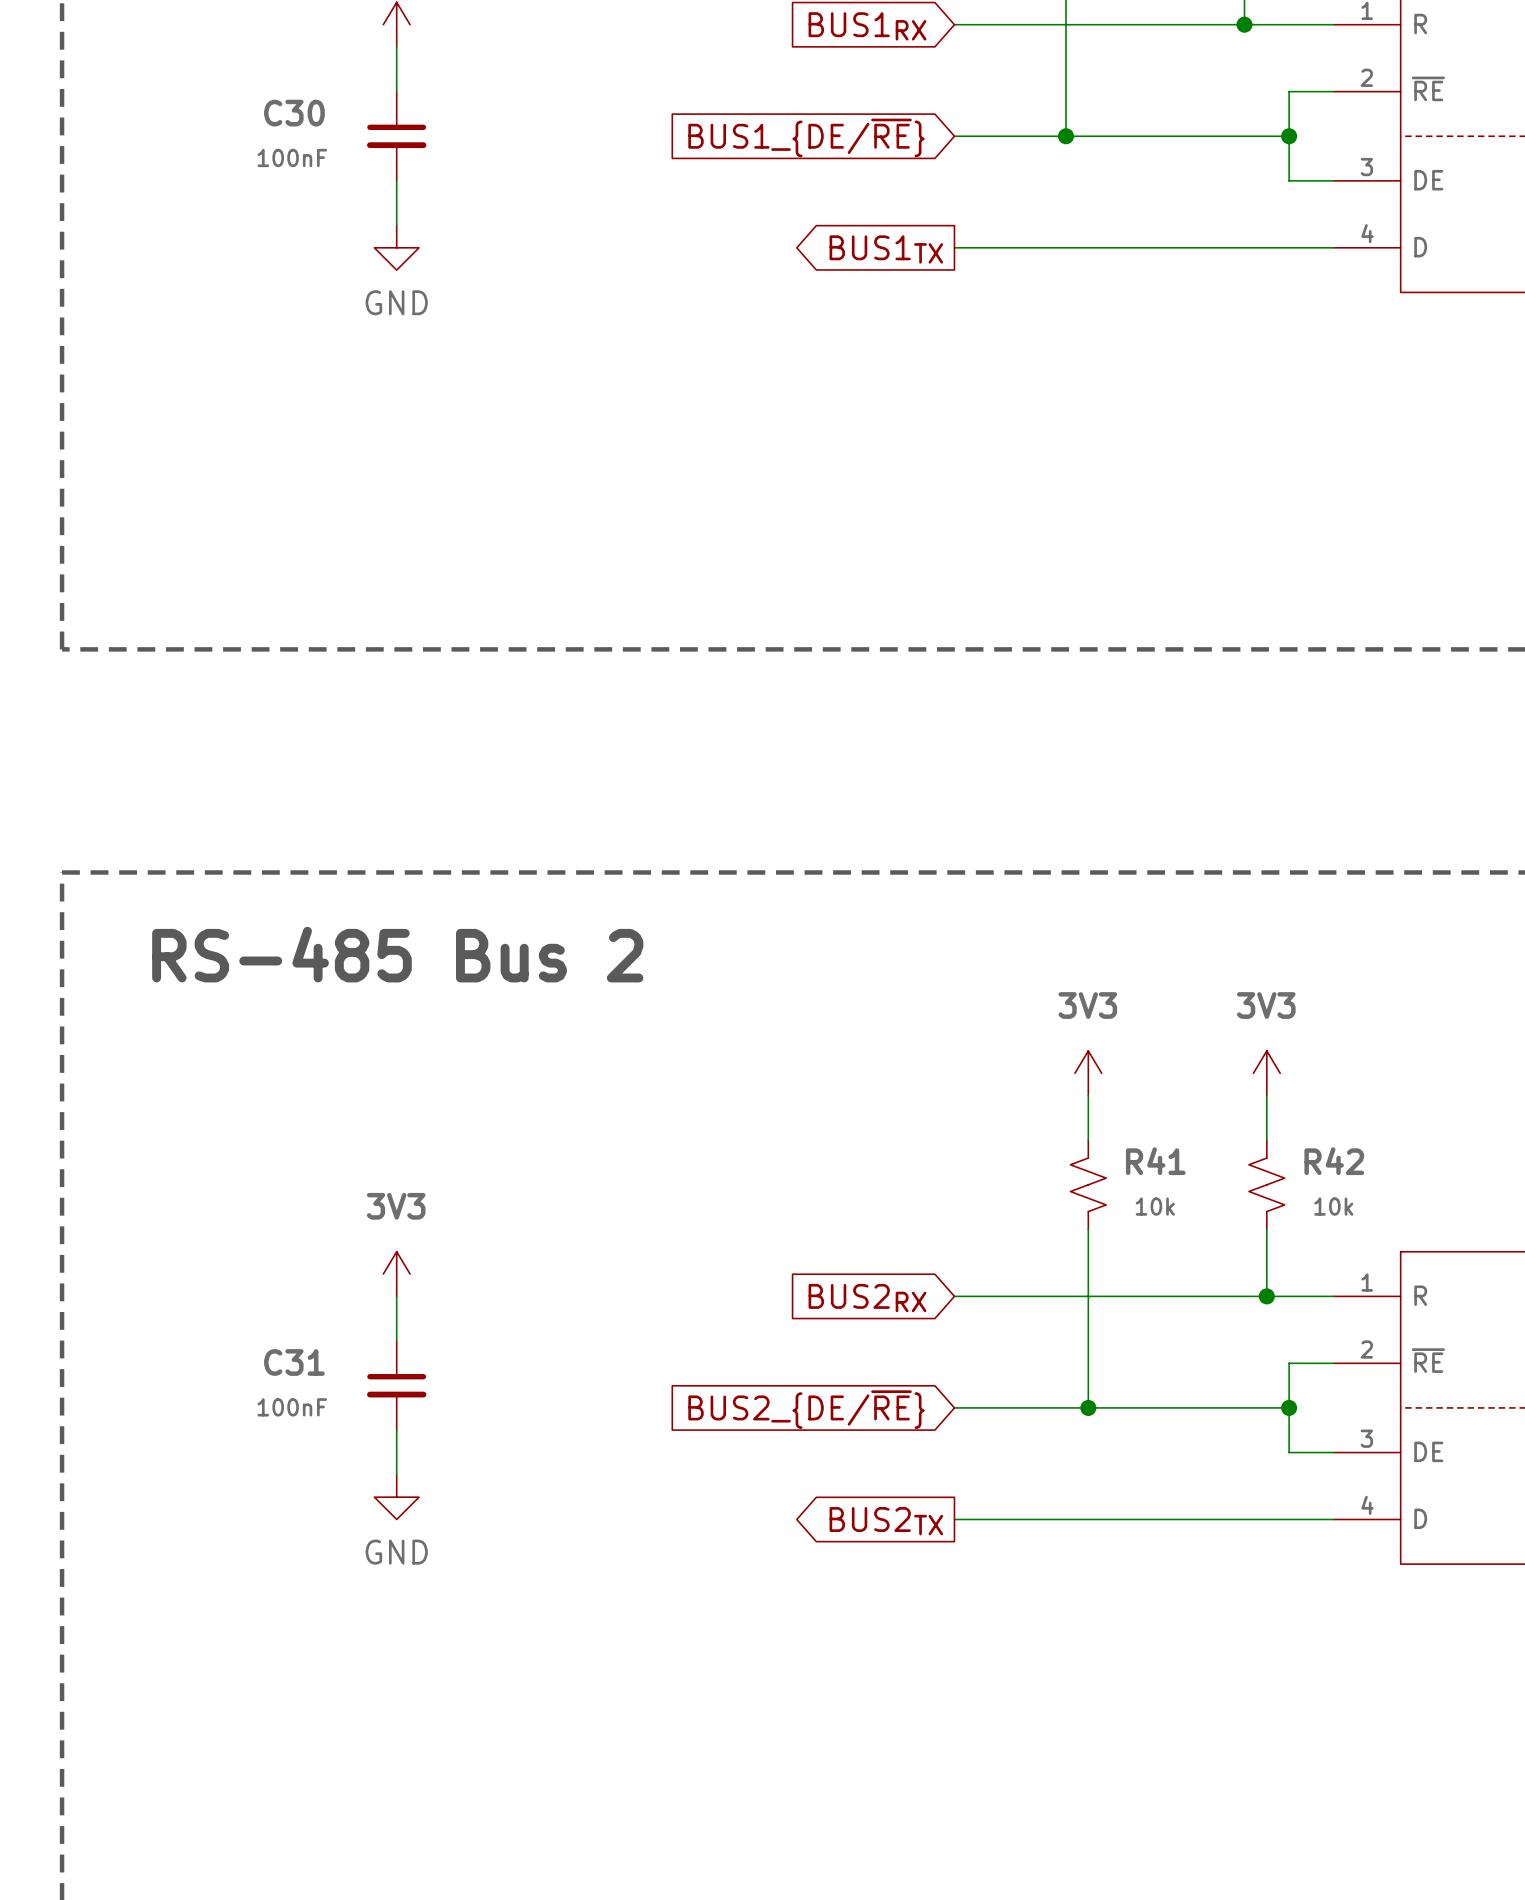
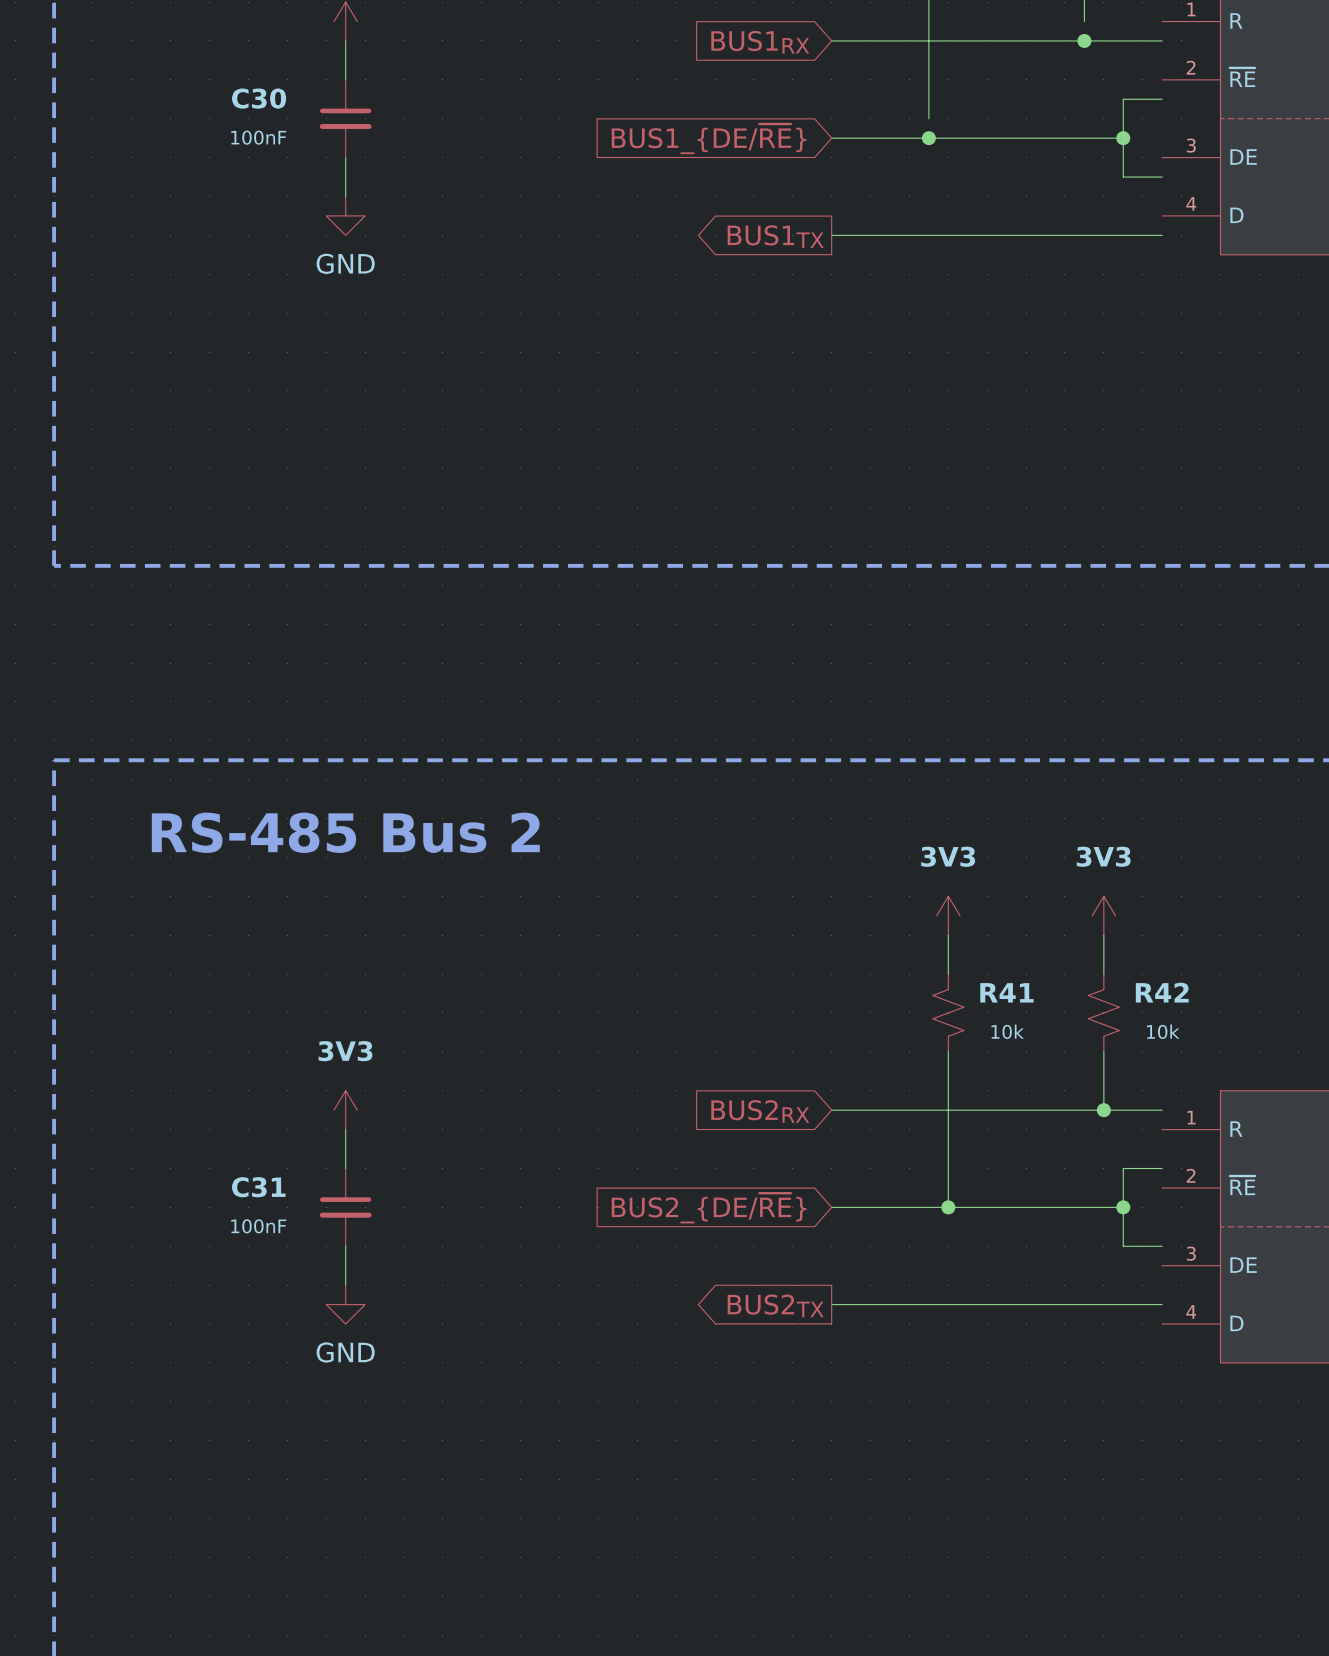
wire: (954, 24) (1333, 24) -> (831, 40) (1162, 40)
junction position: (1244, 24) -> (1084, 40)
global label position: BUS1RX (867, 26) -> BUS1RX (760, 42)
wire: (1333, 91) (1289, 91) (1289, 113) -> (1162, 99) (1123, 99)
wire: (954, 136) (1289, 136) -> (831, 138) (1123, 138)
junction position: (1066, 136) -> (928, 138)
junction position: (1289, 136) -> (1123, 138)
global label position: BUS1_{DE/~{RE}} (806, 137) -> BUS1_{DE/~{RE}} (709, 139)
wire: (1289, 180) (1333, 180) -> (1123, 157) (1123, 177) (1162, 177)
wire: (954, 247) (1333, 247) -> (831, 235) (1162, 235)
global label position: BUS1TX (886, 249) -> BUS1TX (775, 236)
power symbol position: 3V3 (1088, 1073) -> 3V3 (948, 915)
power symbol position: 3V3 (1266, 1073) -> 3V3 (1103, 915)
R41 position: (1088, 1184) -> (948, 1012)
R42 position: (1266, 1184) -> (1103, 1012)
wire: (954, 1296) (1333, 1296) -> (831, 1110) (1162, 1110)
junction position: (1266, 1296) -> (1103, 1110)
global label position: BUS2RX (867, 1298) -> BUS2RX (760, 1111)
wire: (1289, 1363) (1333, 1363) -> (1123, 1187) (1123, 1168) (1162, 1168)
wire: (954, 1407) (1289, 1407) -> (831, 1207) (1123, 1207)
junction position: (1088, 1407) -> (948, 1207)
junction position: (1289, 1407) -> (1123, 1207)
global label position: BUS2_{DE/~{RE}} (806, 1409) -> BUS2_{DE/~{RE}} (709, 1208)
wire: (1289, 1430) (1289, 1452) (1333, 1452) -> (1123, 1246) (1162, 1246)
wire: (954, 1519) (1333, 1519) -> (831, 1304) (1162, 1304)
global label position: BUS2TX (886, 1521) -> BUS2TX (775, 1305)

